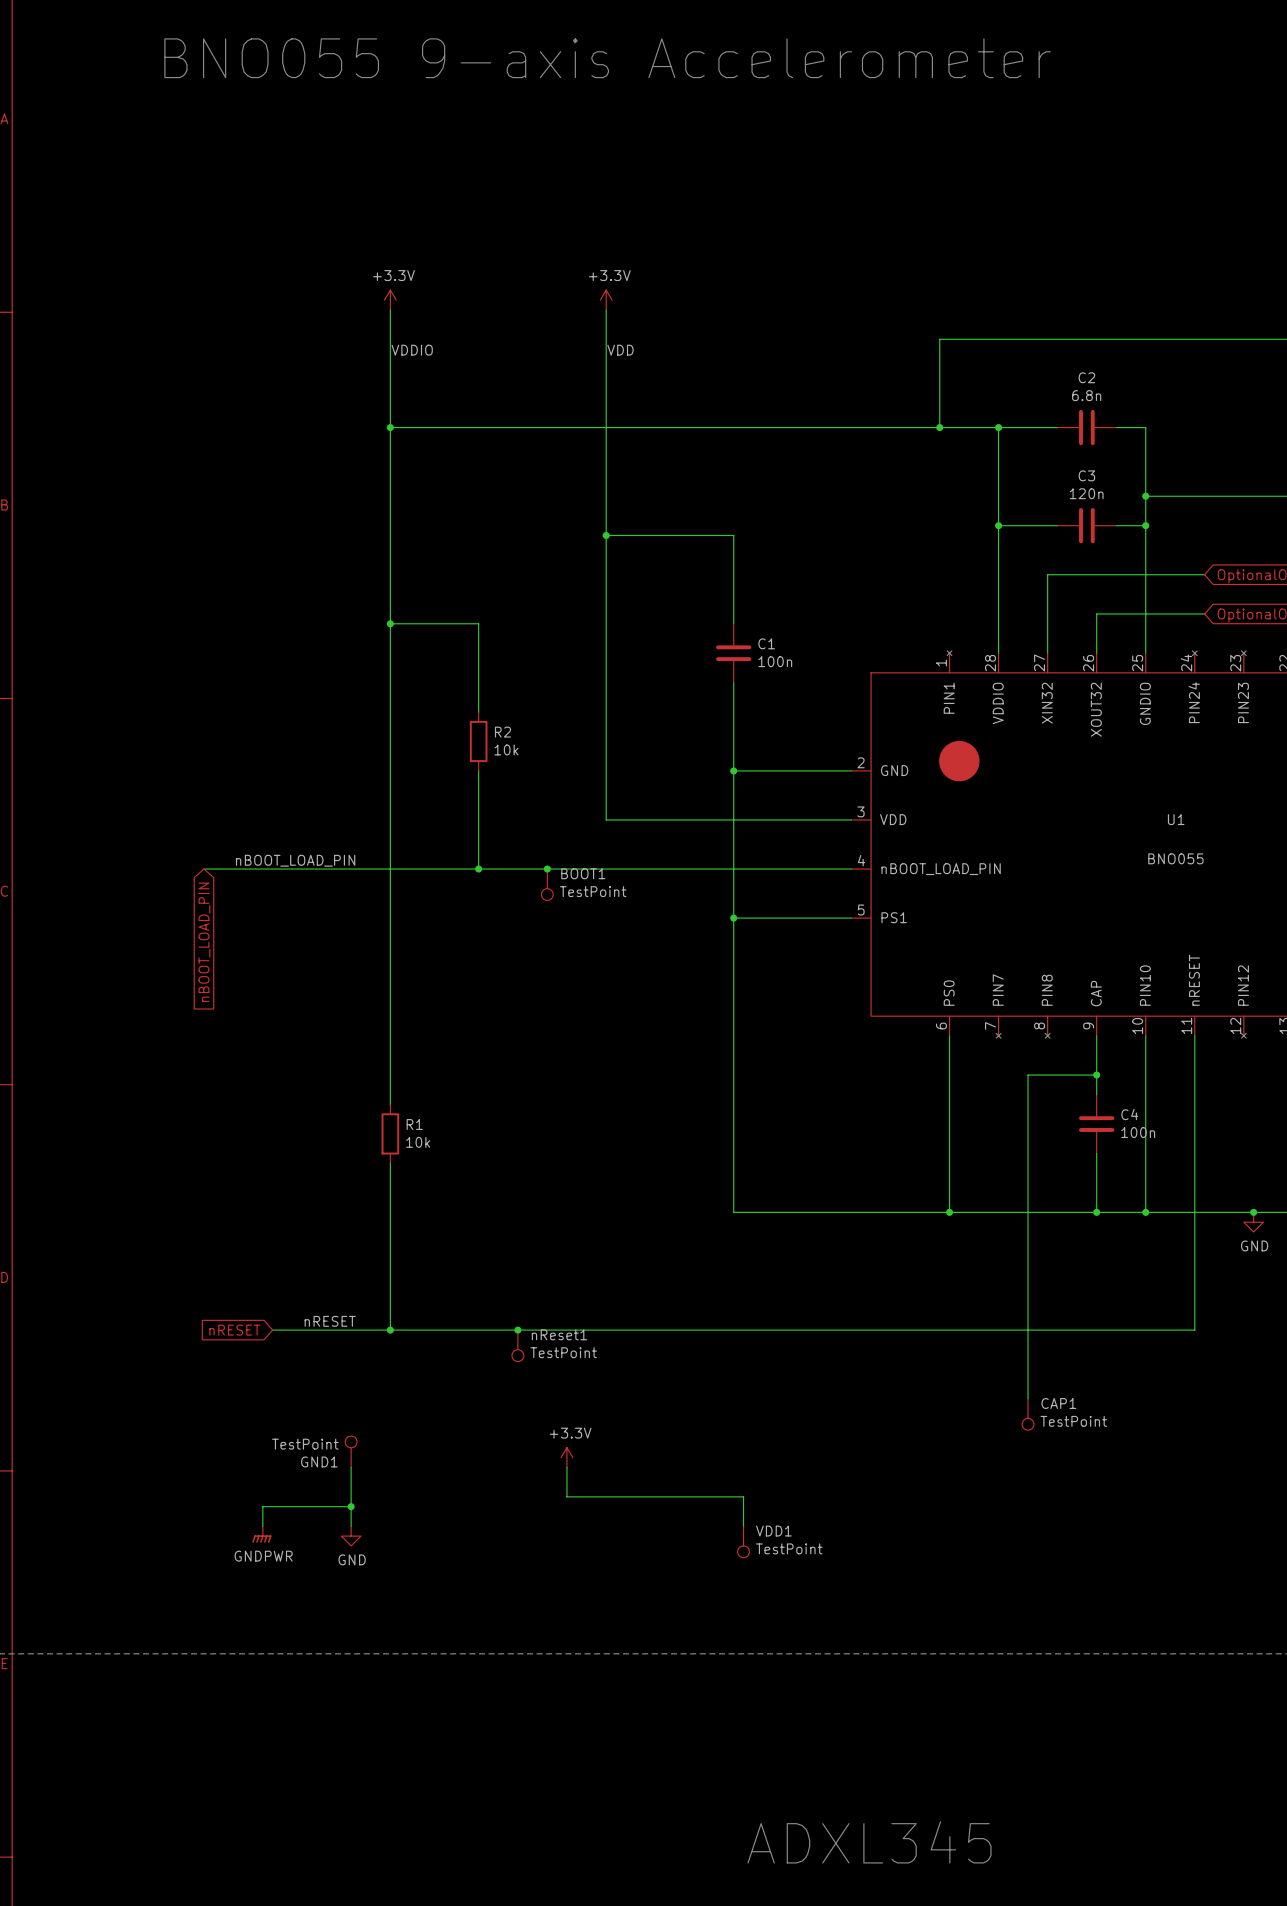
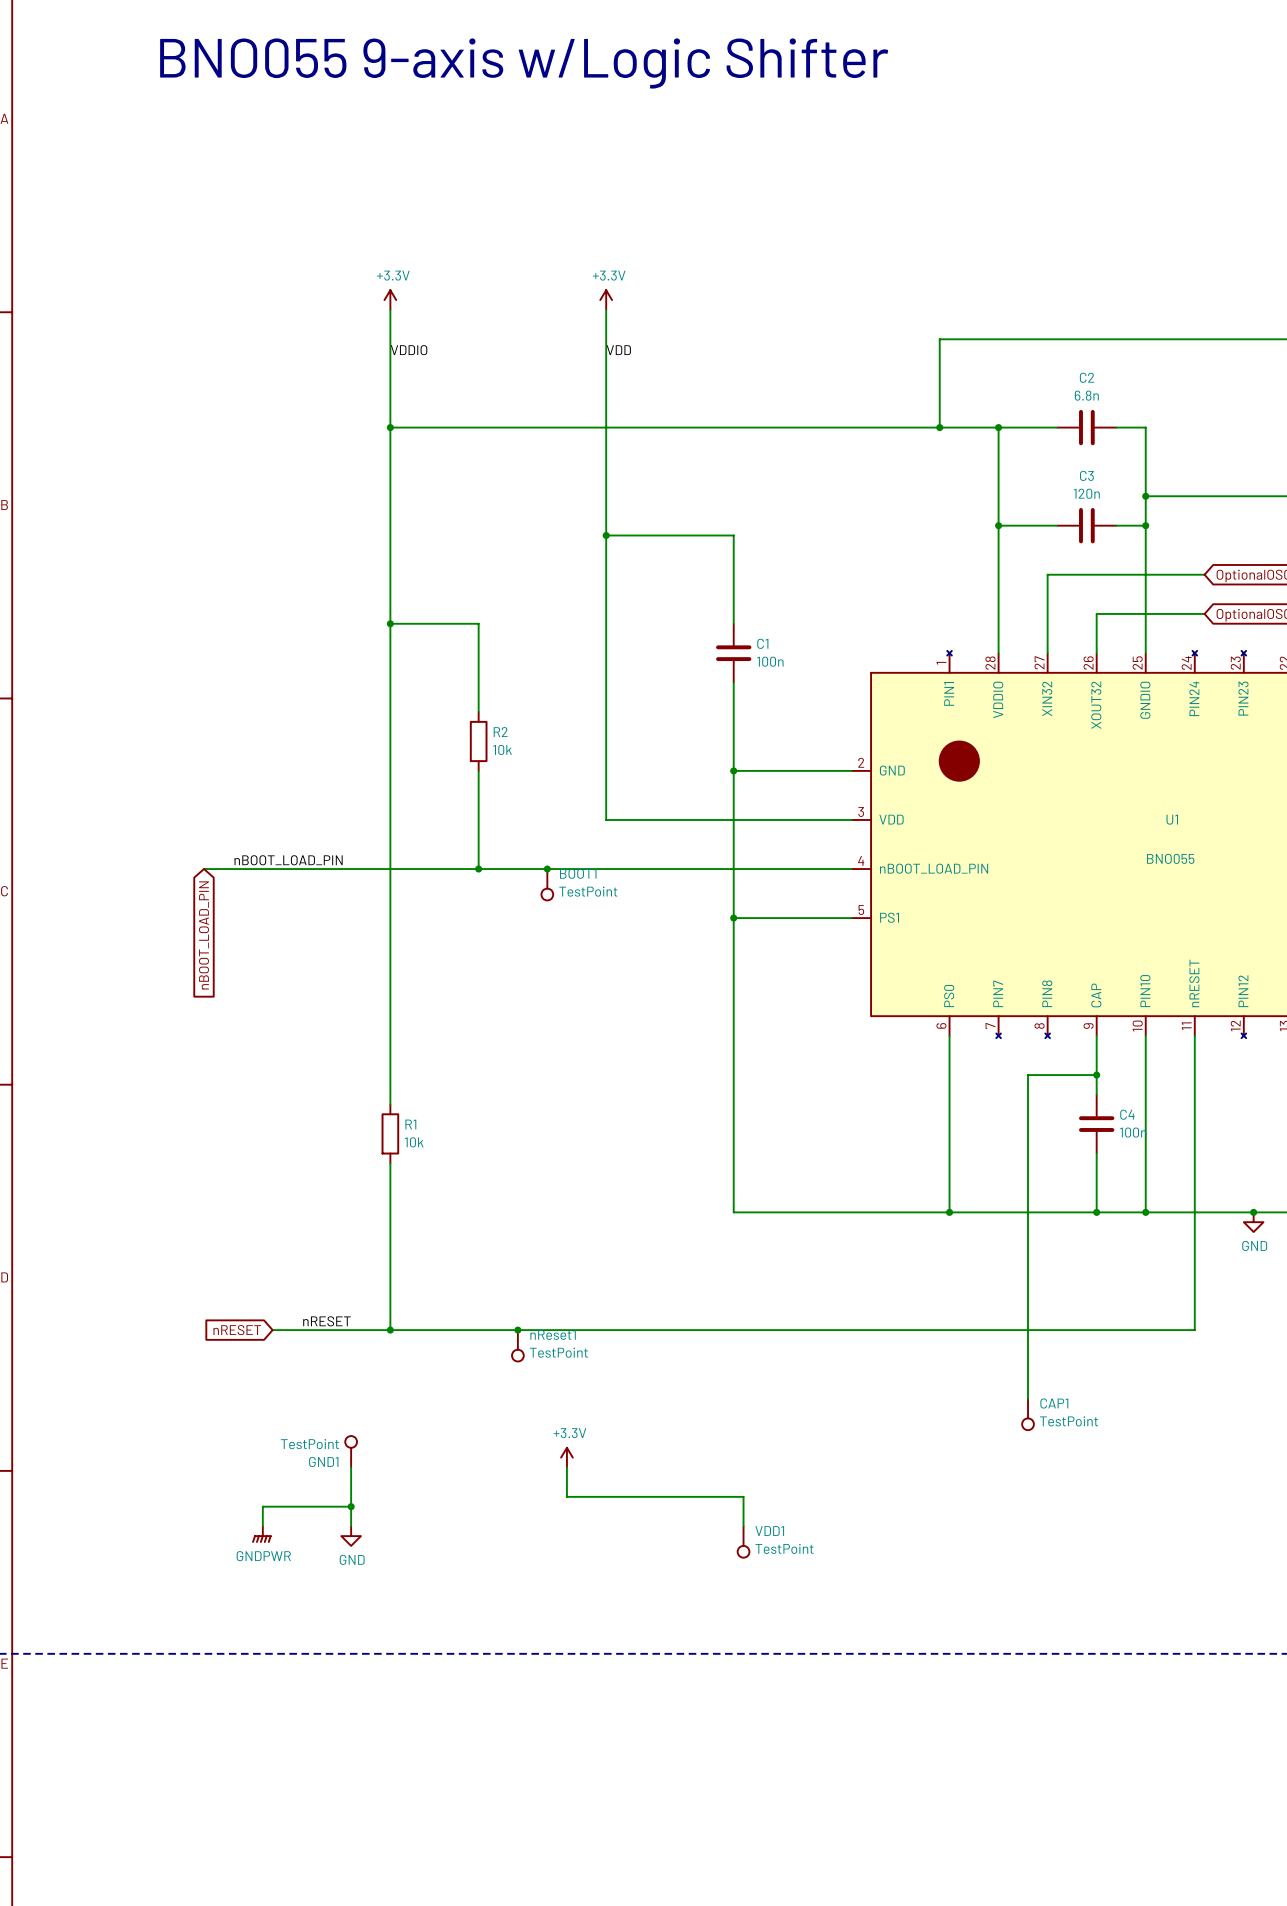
text: BNO055 9-axis Accelerometer (607, 58) -> BNO055 9-axis w/Logic Shifter (524, 63)
text: ADXL345 (869, 1842) -> none

